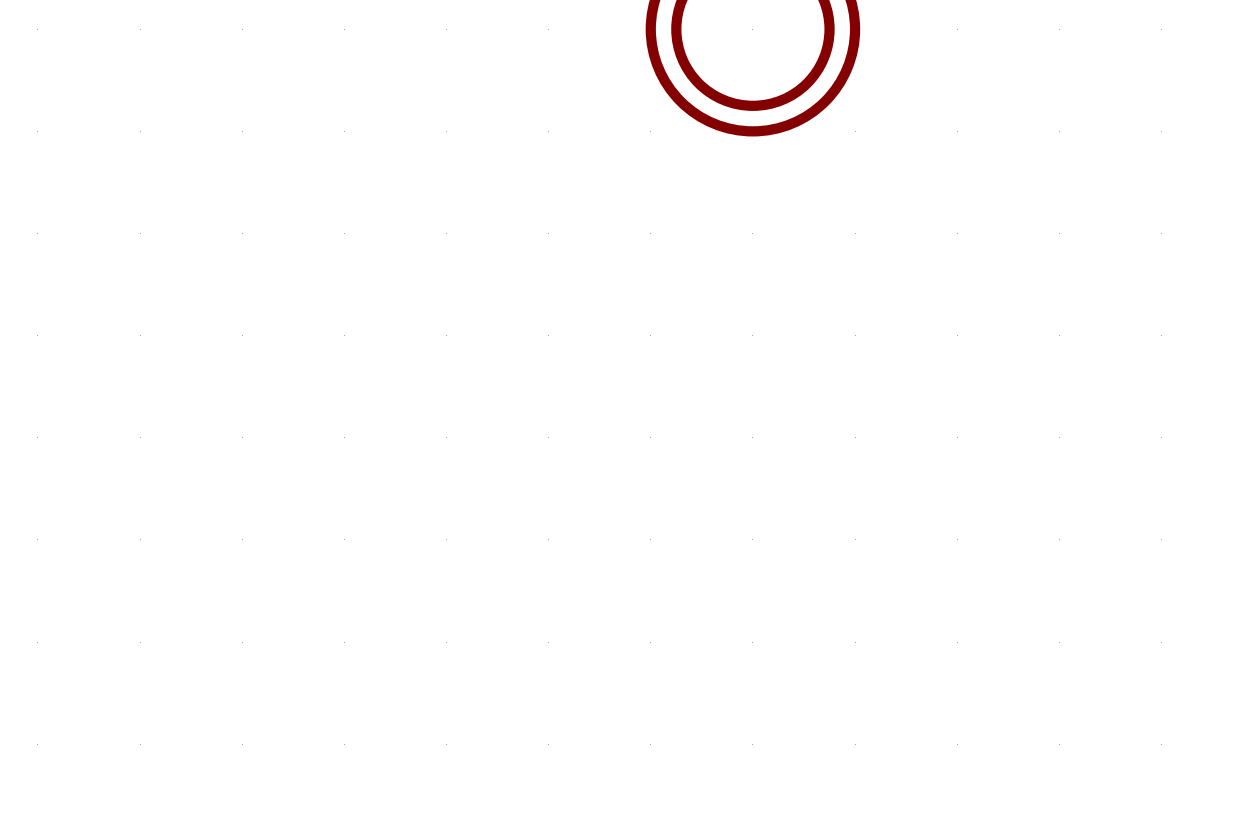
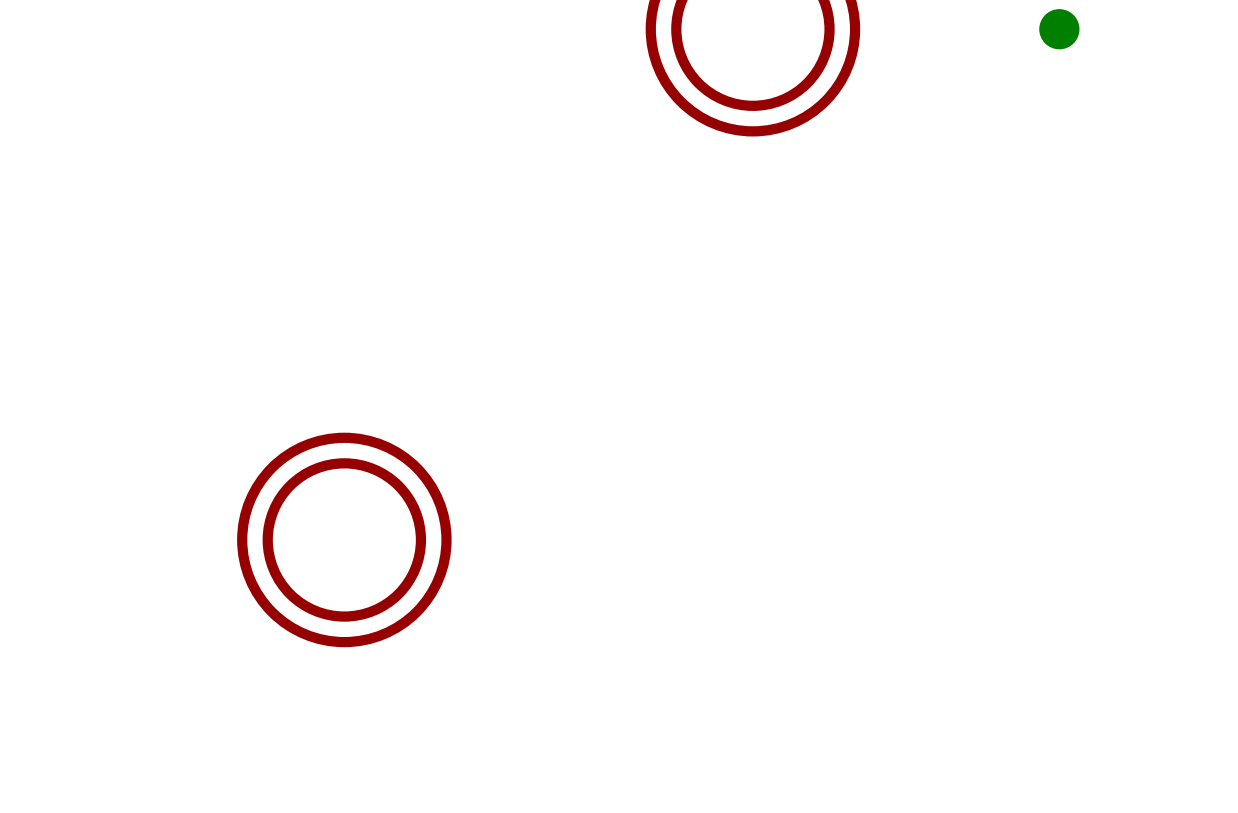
junction: none -> (1059, 29)
part: none -> (344, 539)

